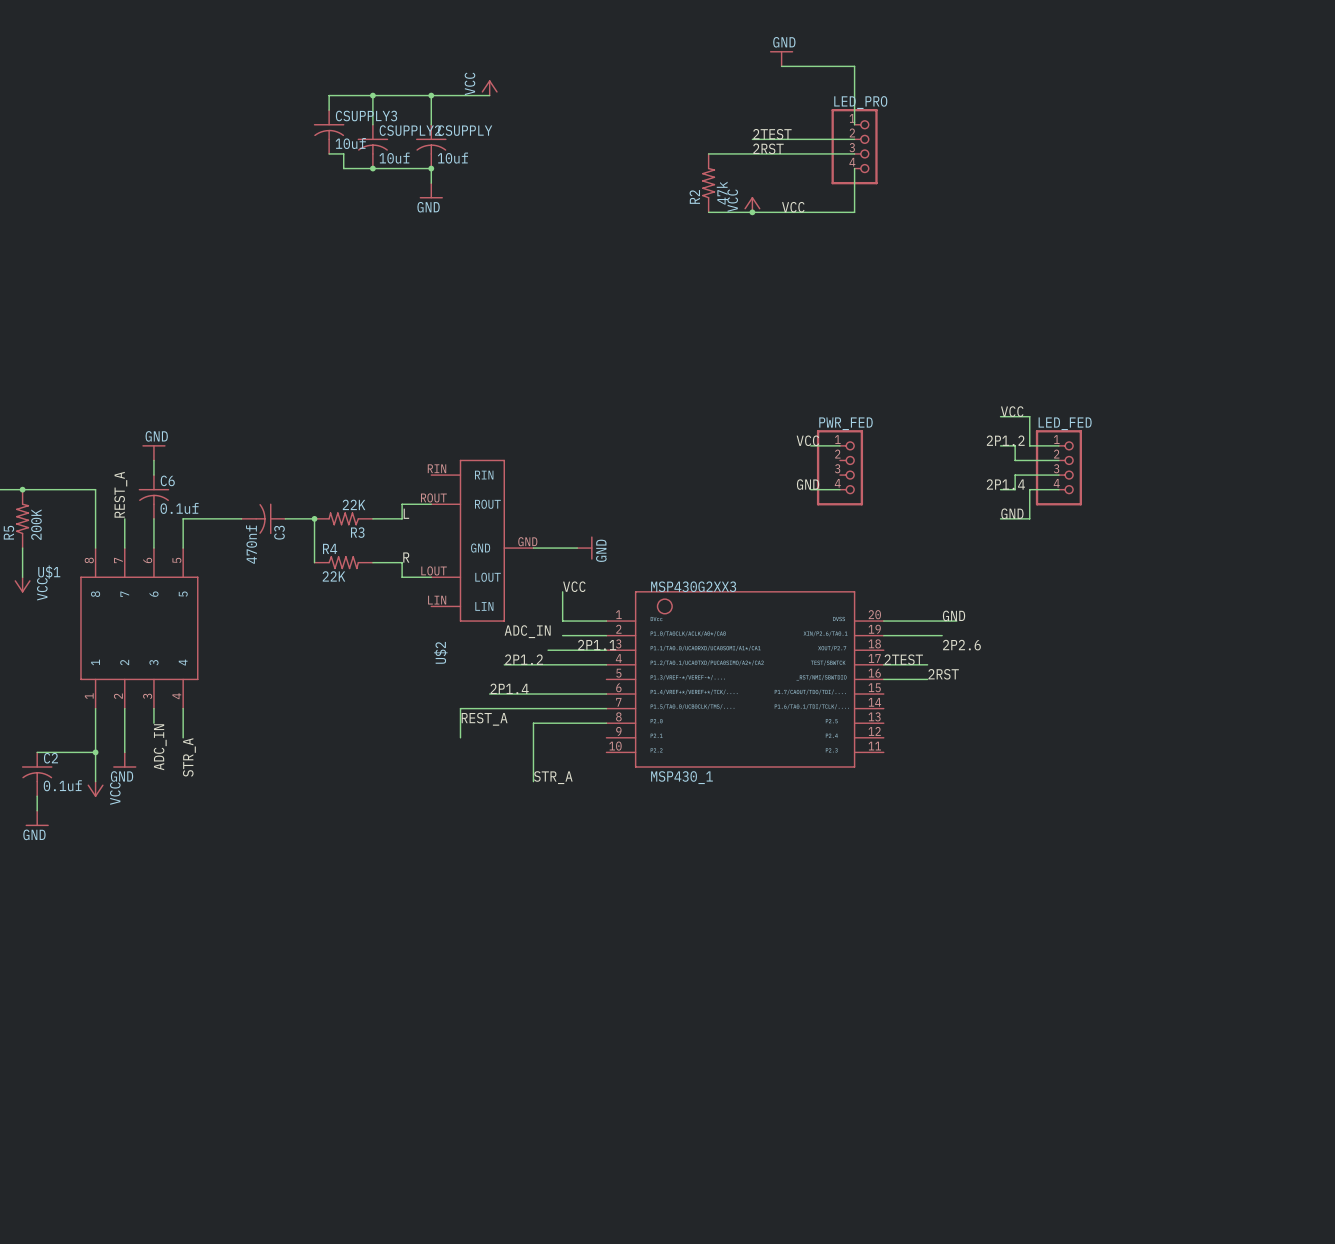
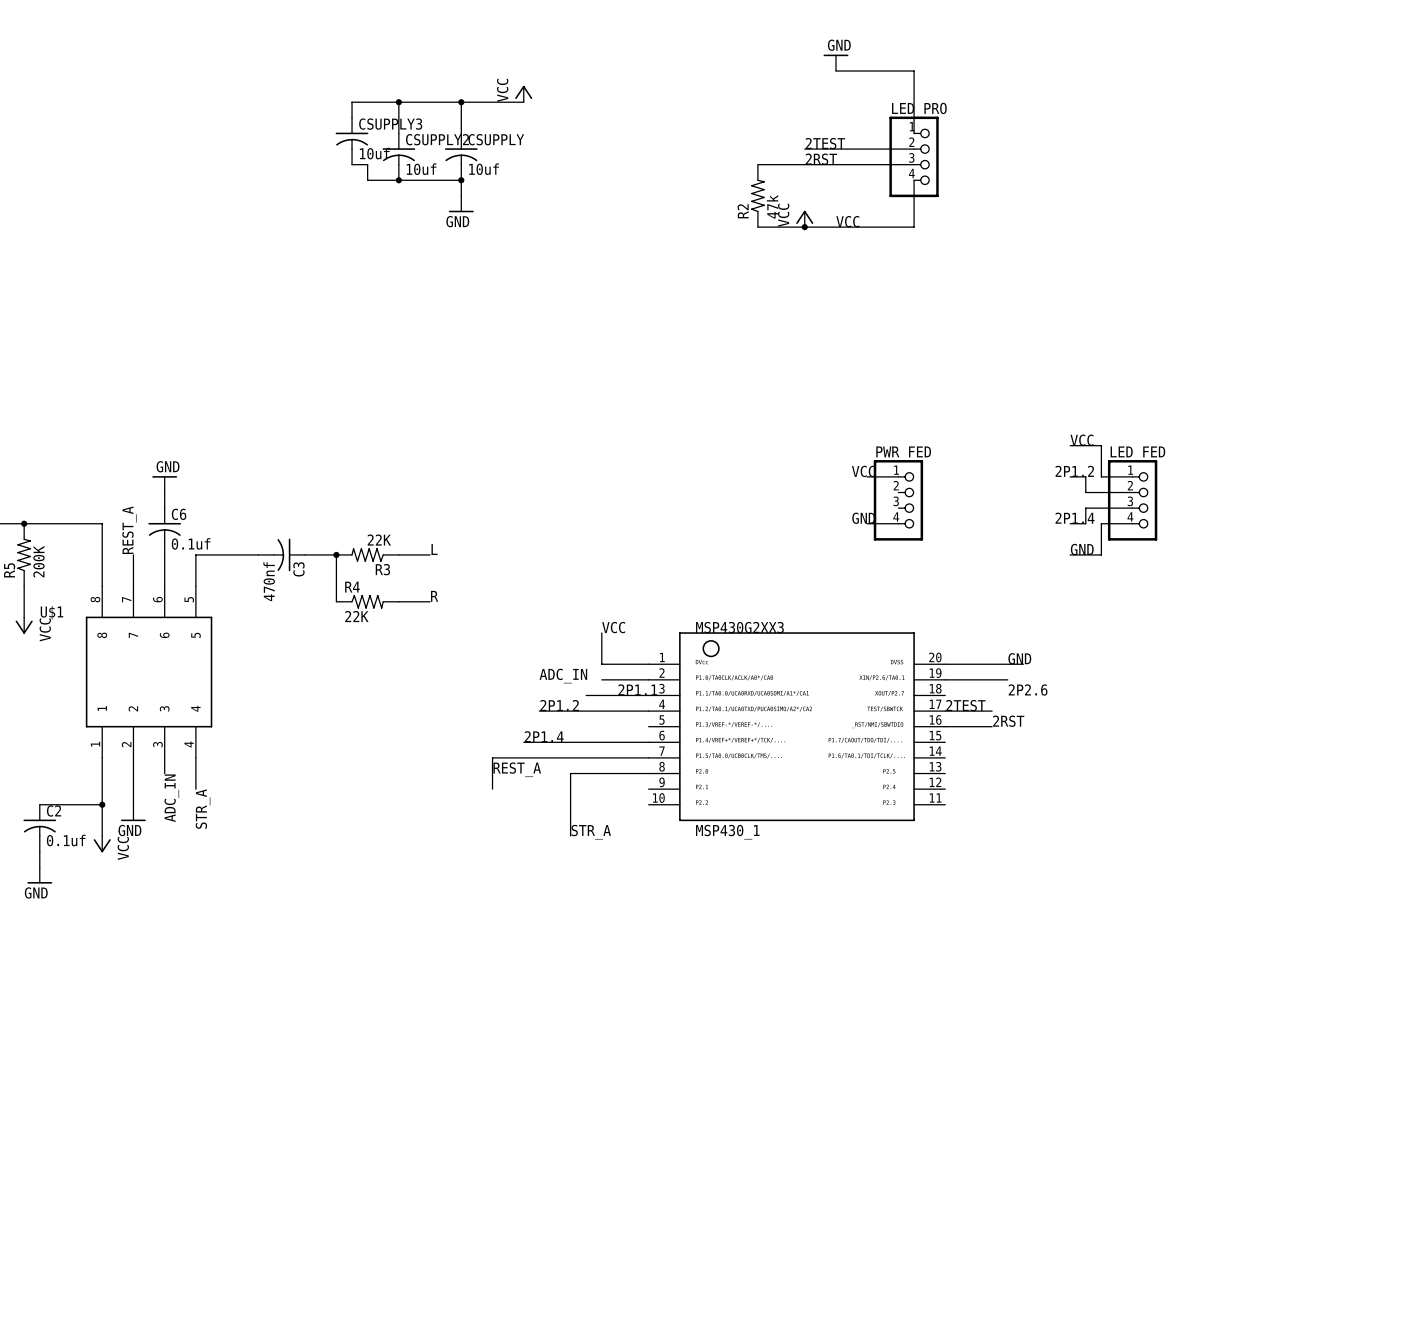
wire: (431, 504) (402, 504) (402, 518) -> none
U$2: (482, 540) -> none
wire: (533, 548) (577, 548) -> none
power symbol: GND (584, 548) -> none
wire: (402, 562) (402, 577) (431, 577) -> none

